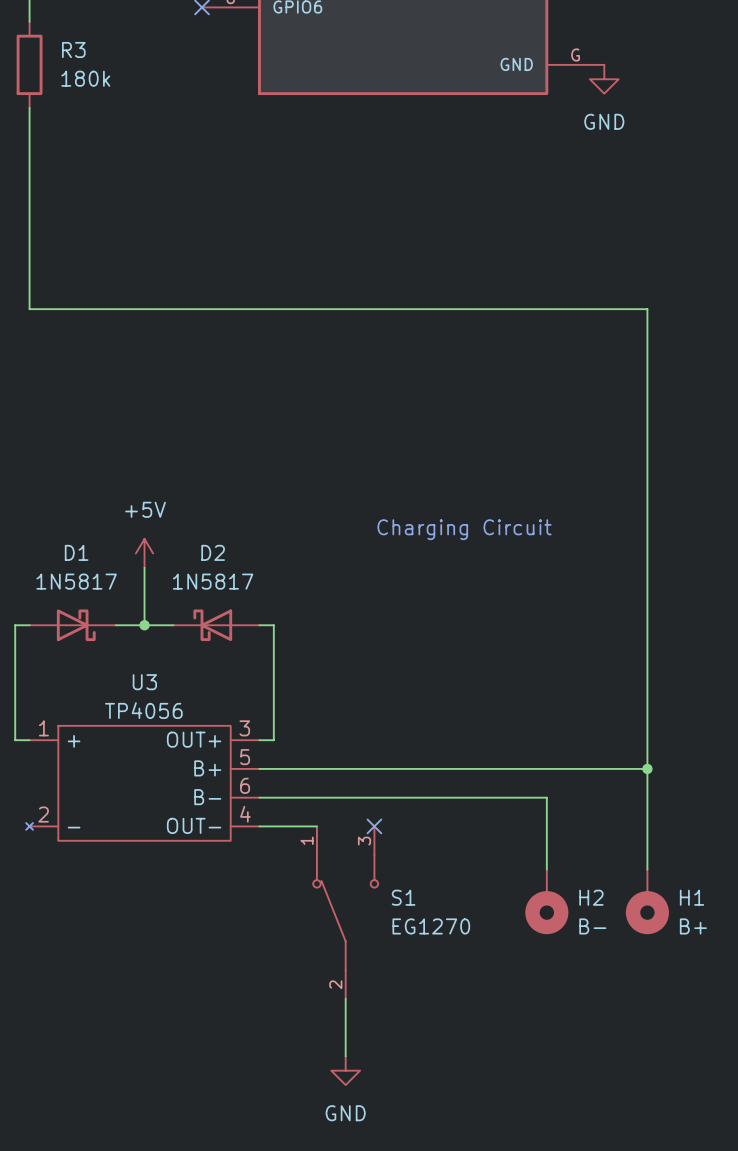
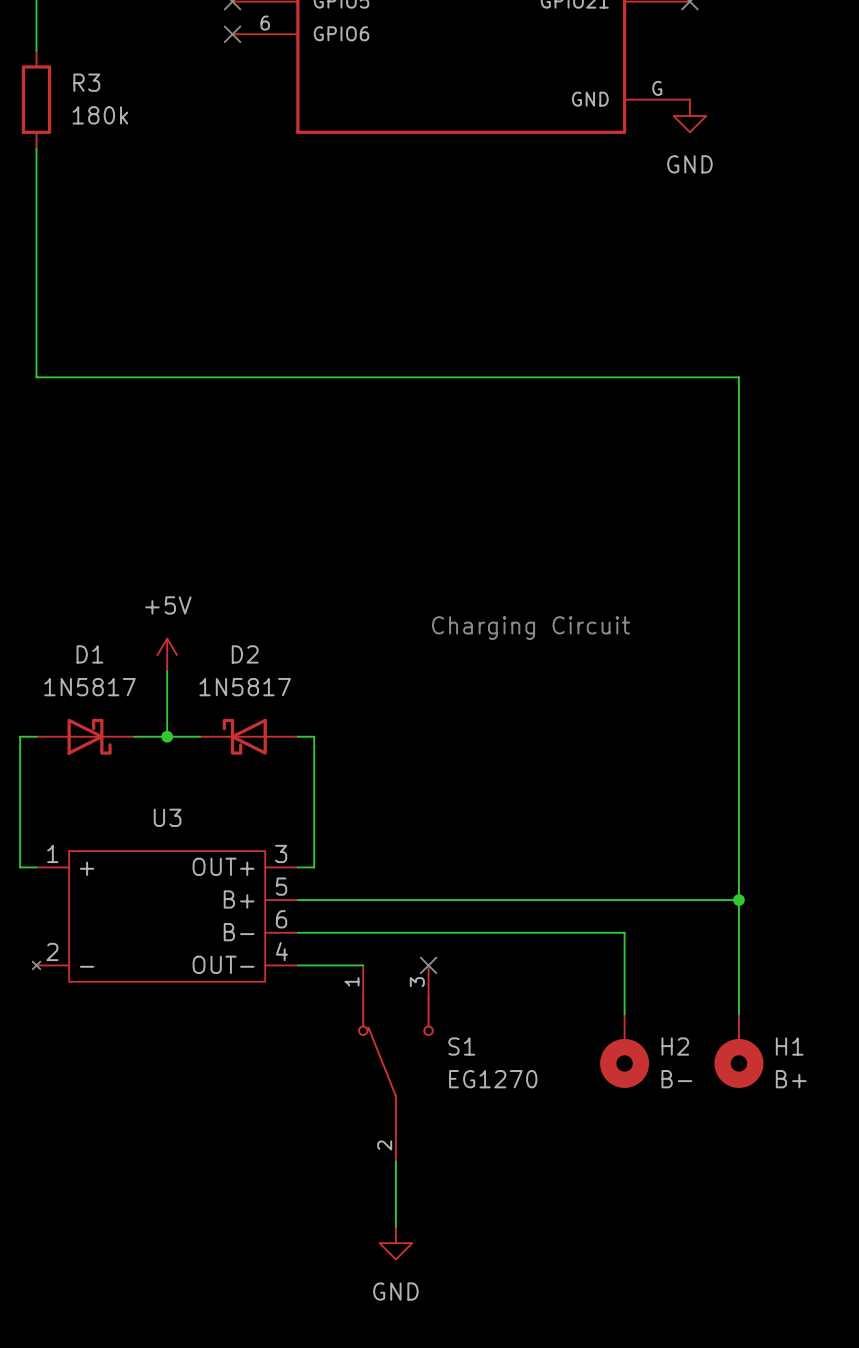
U3 name position: U3 (144, 682) -> U3 (167, 817)
U3 value: TP4056 (143, 710) -> none

